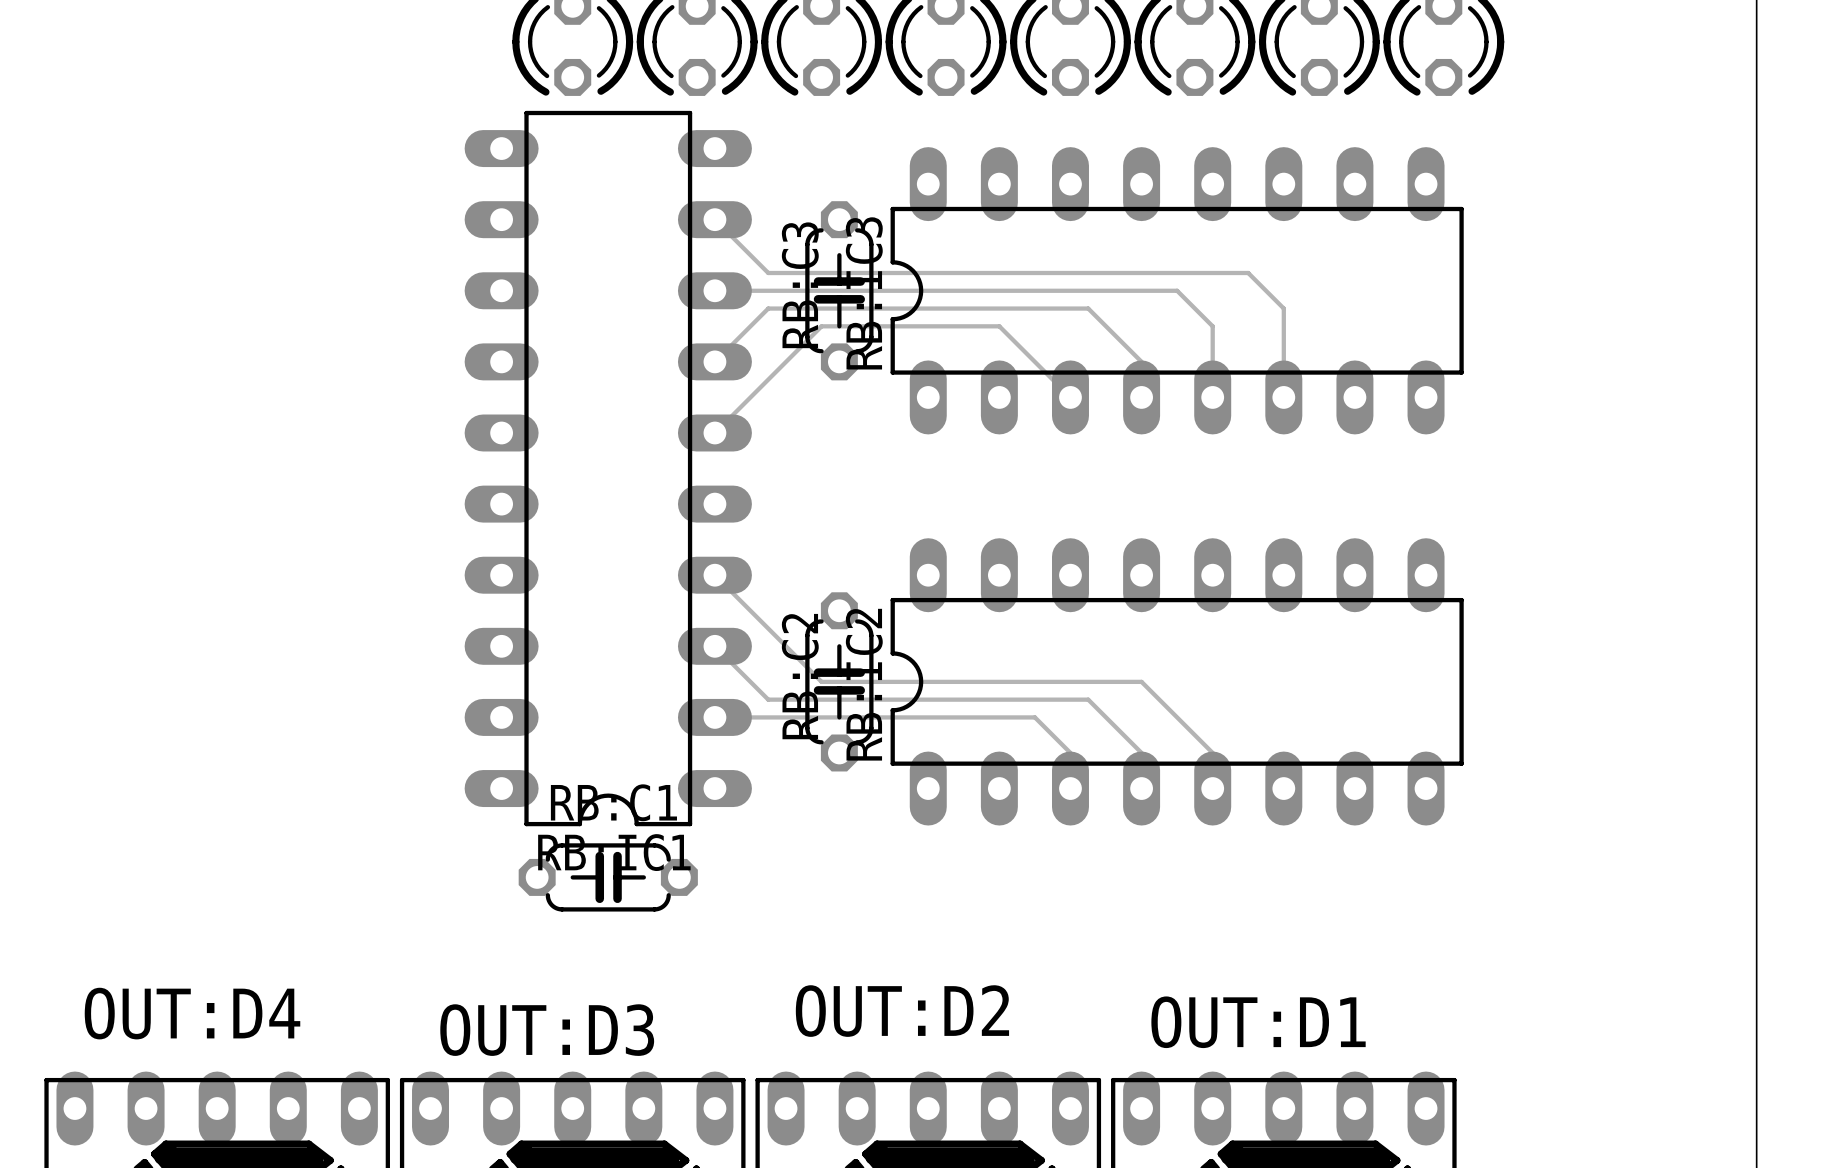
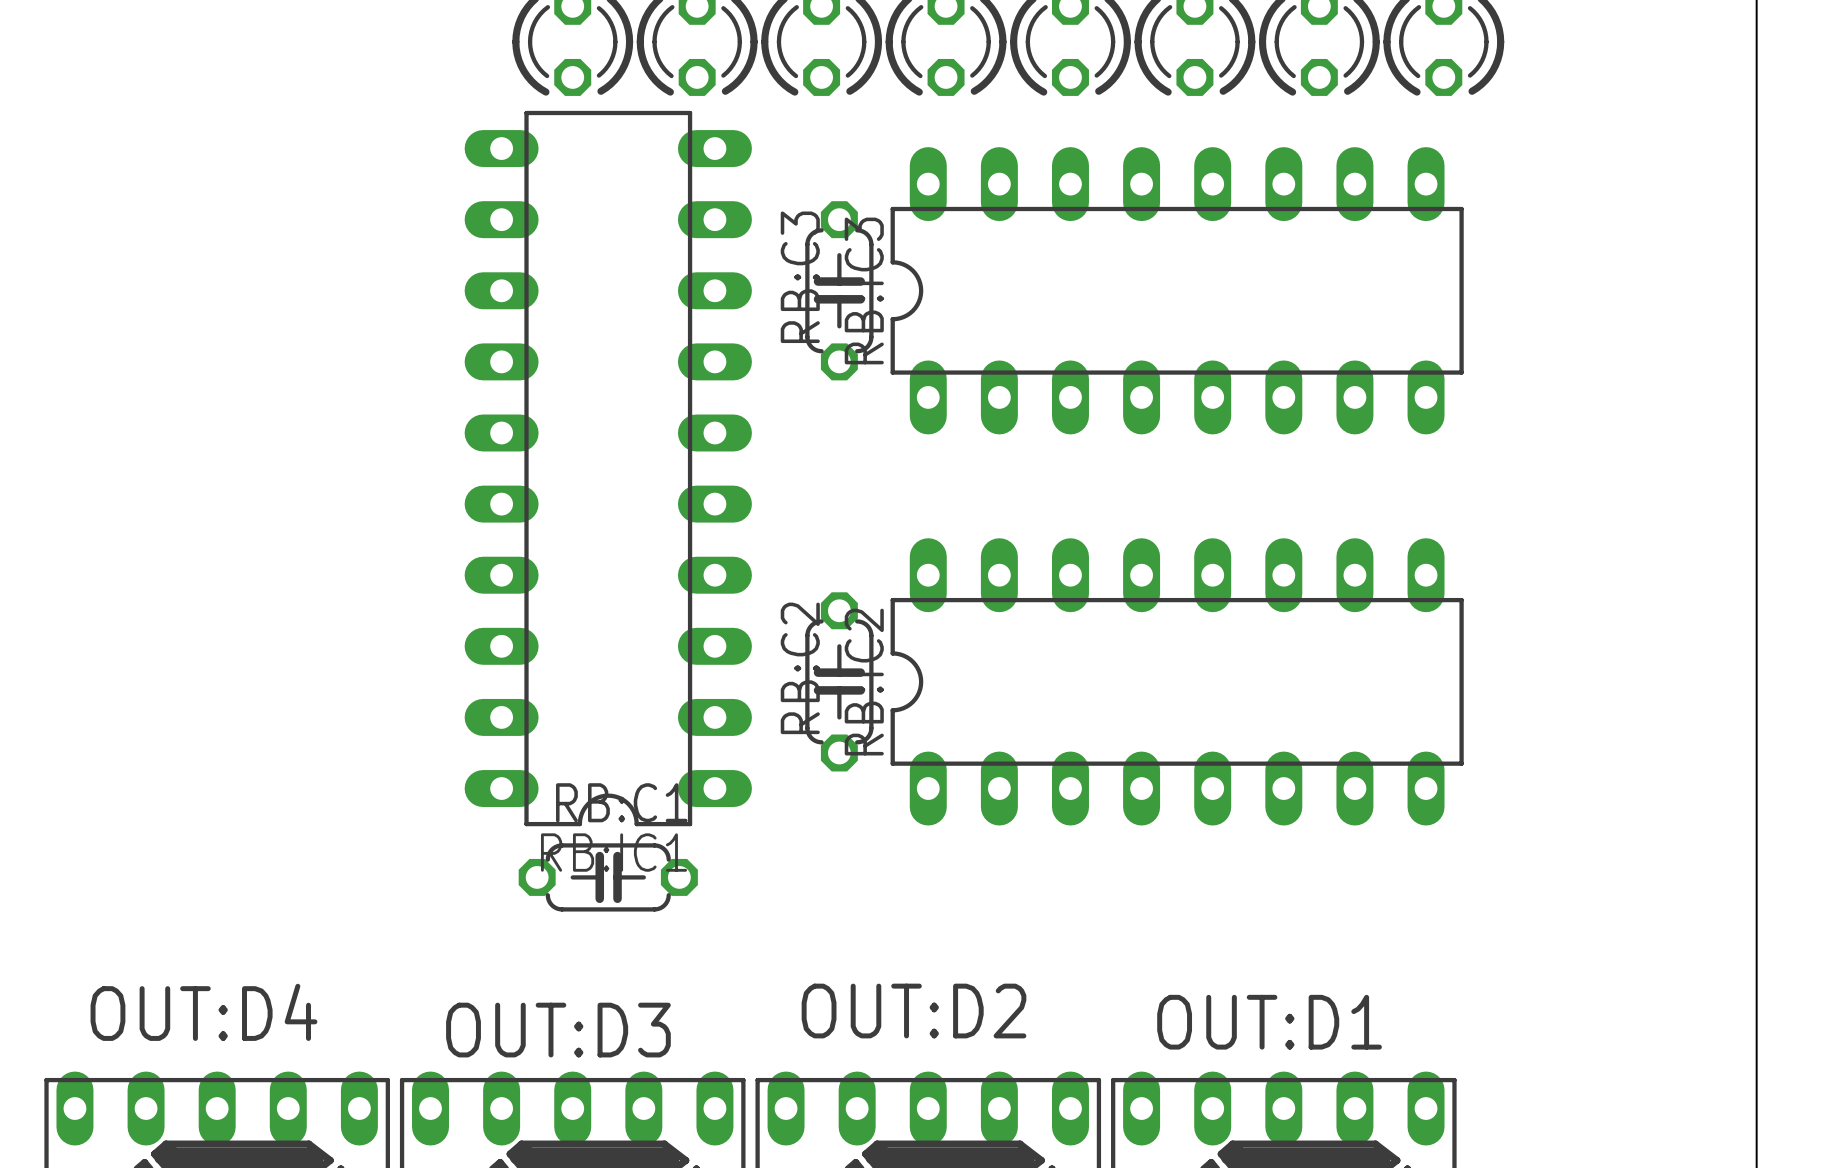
track: (714, 219) (768, 272) (1248, 272) (1283, 308) (1283, 397) -> none
track: (714, 290) (1177, 290) (1212, 326) (1212, 397) -> none
track: (714, 361) (768, 308) (1088, 308) (1141, 361) (1141, 397) -> none
track: (1070, 397) (999, 326) (821, 326) (714, 432) -> none
track: (714, 575) (821, 681) (1141, 681) (1212, 752) (1212, 788) -> none
track: (714, 646) (768, 699) (1088, 699) (1141, 752) (1141, 788) -> none
track: (714, 717) (1034, 717) (1070, 752) (1070, 788) -> none

